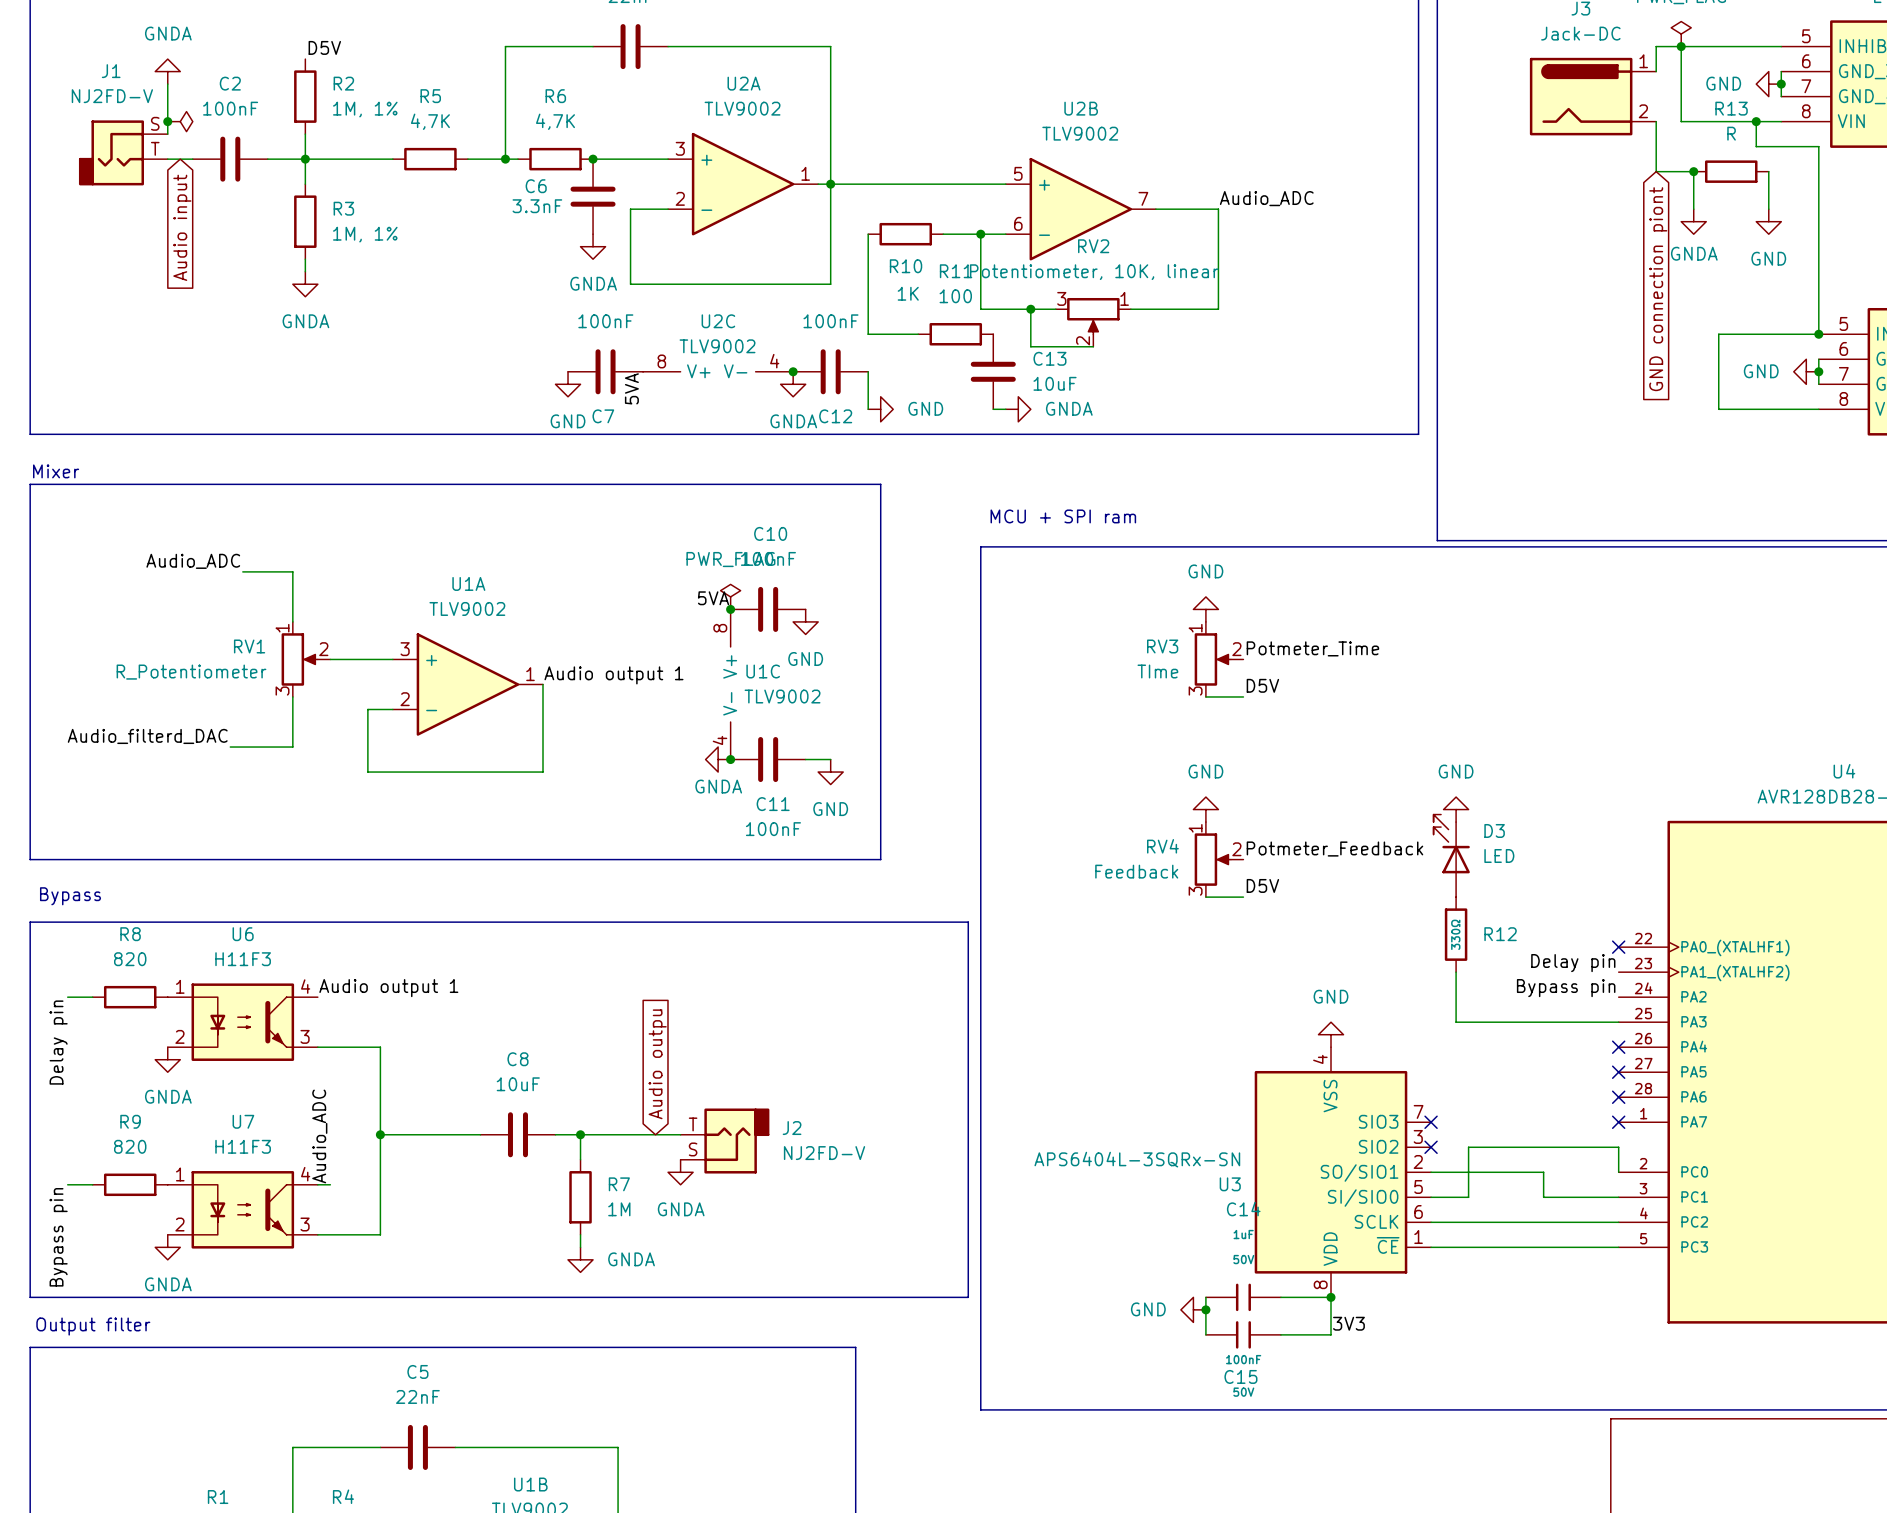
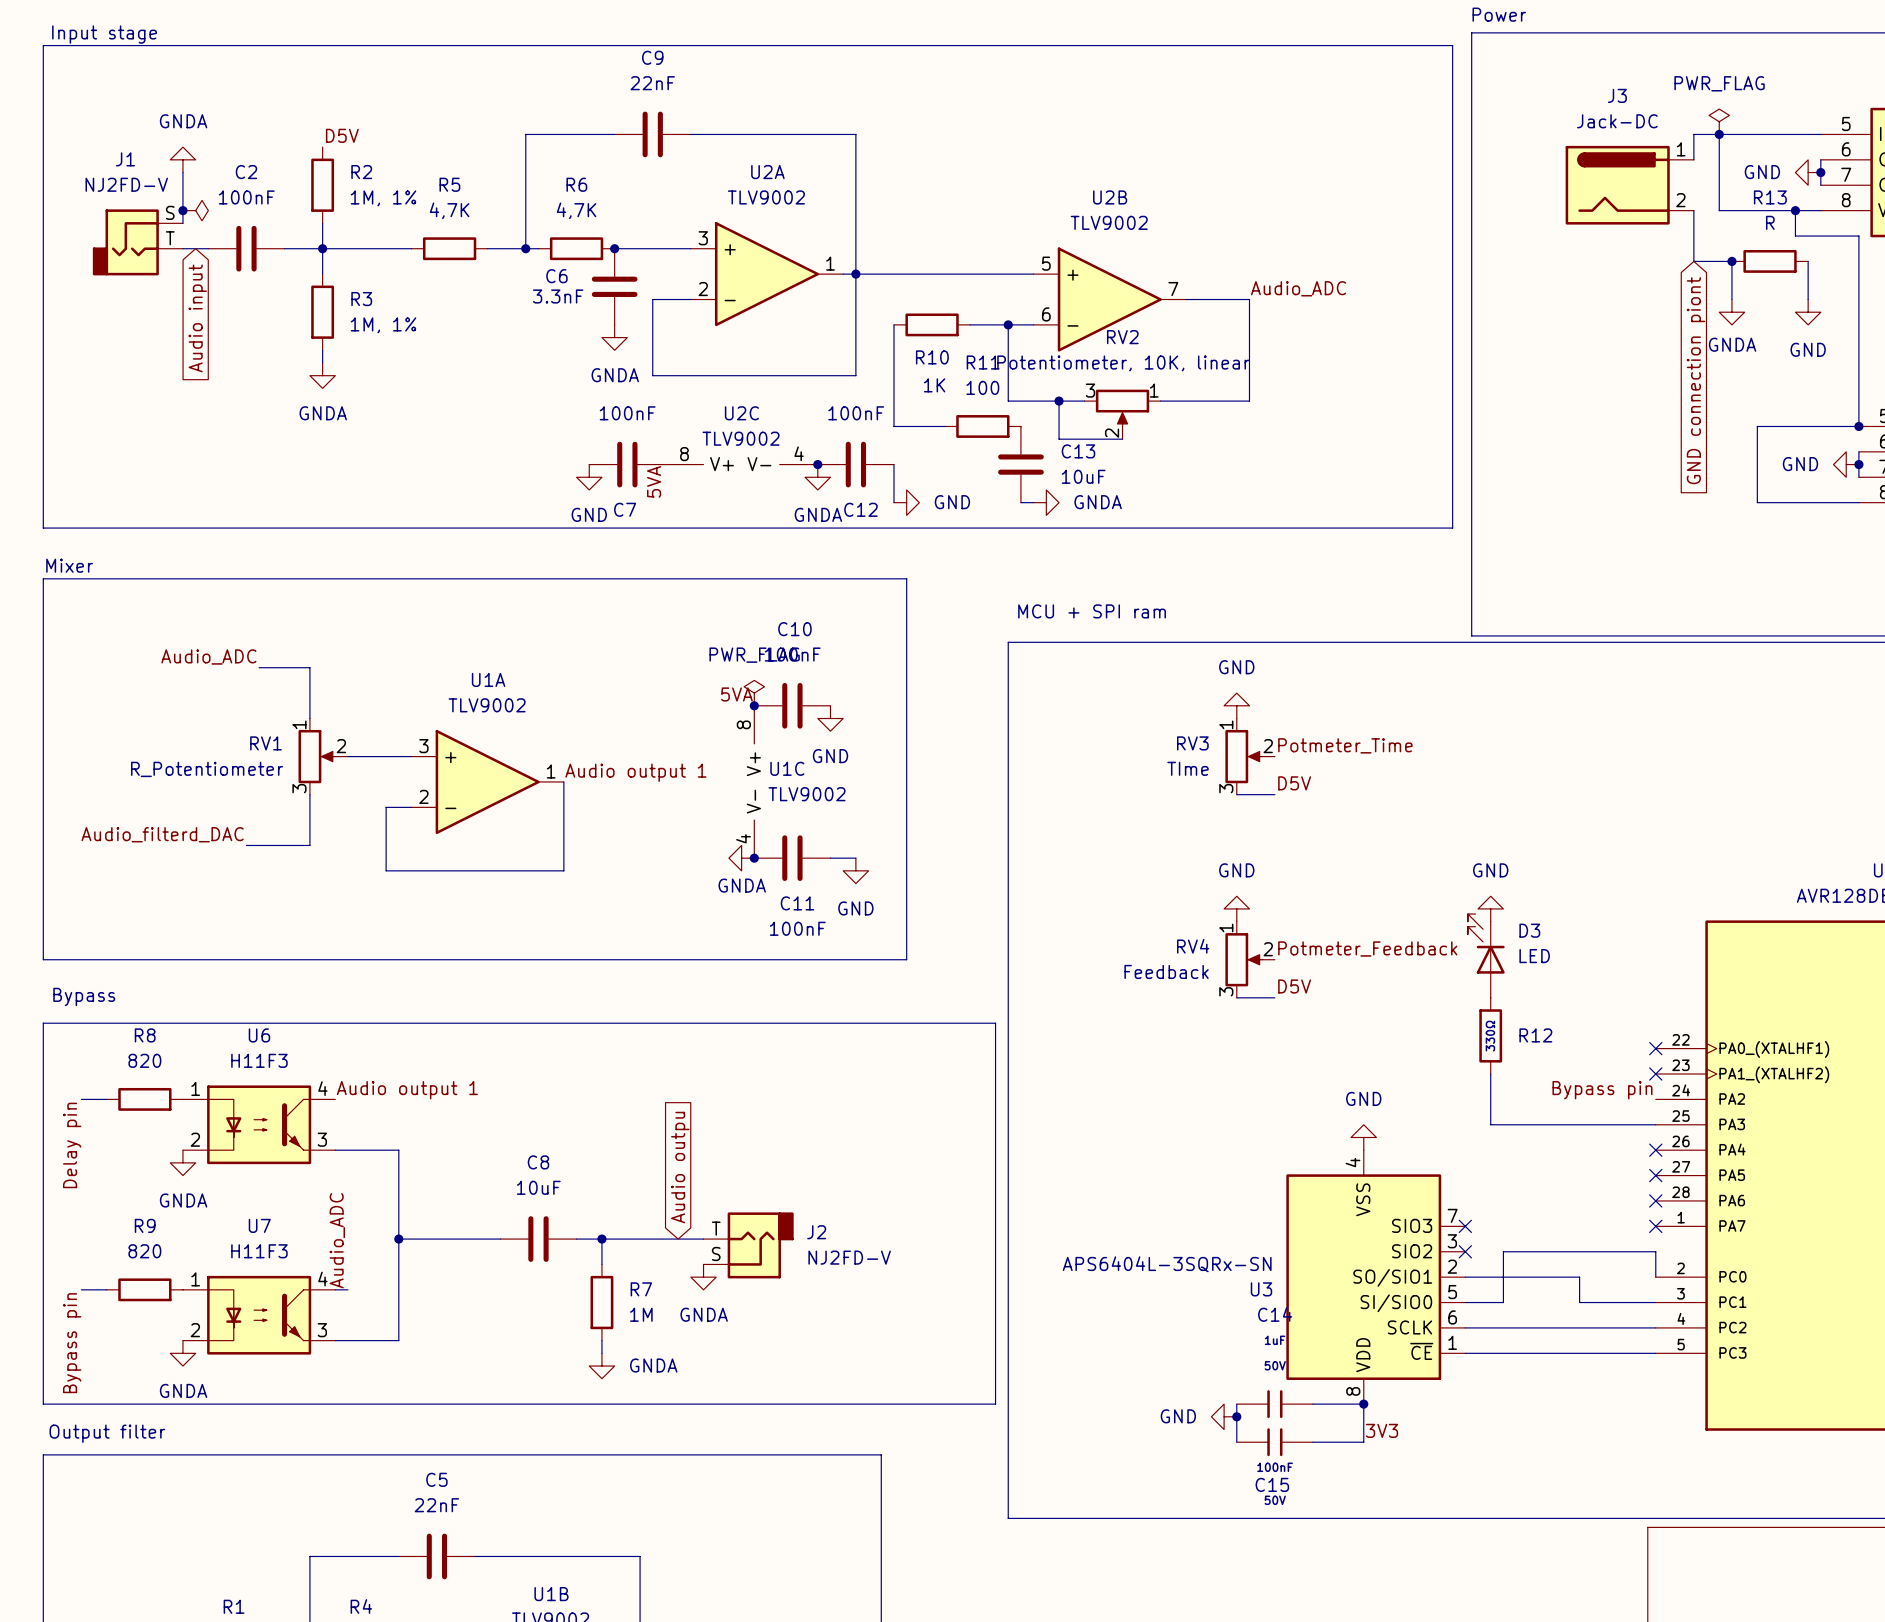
label: Delay pin (1573, 963) -> none
no-connect mark: none -> (1655, 1074)

